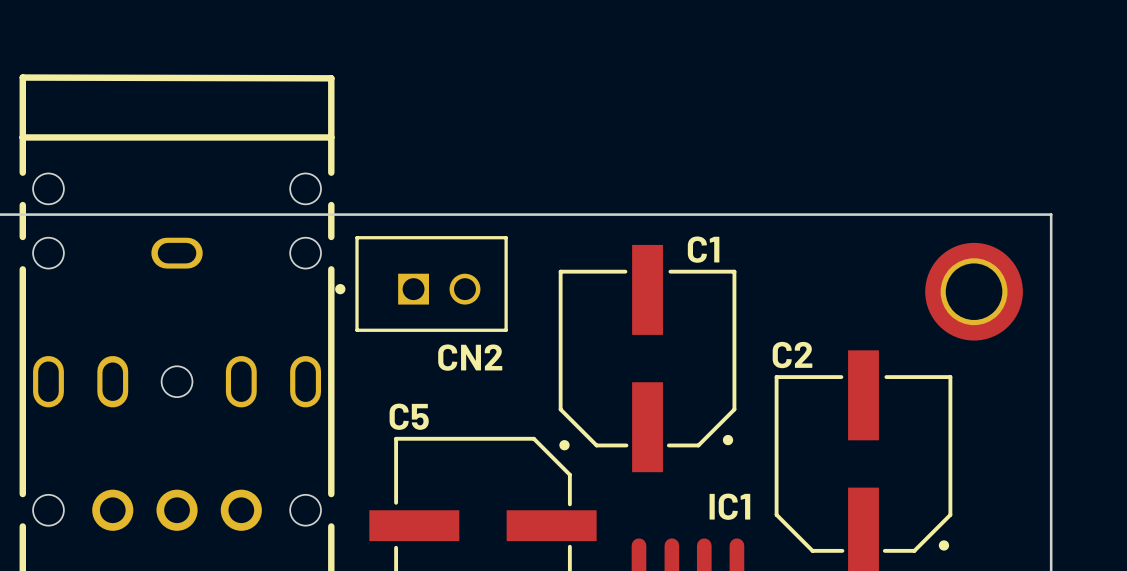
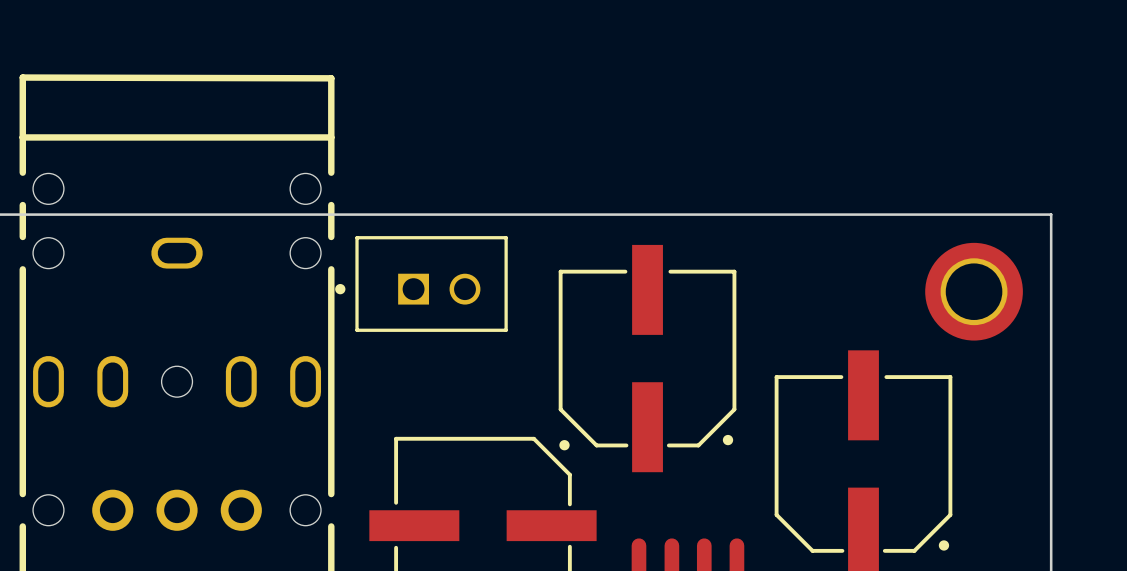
C1 name: C1 (703, 249) -> none
C2 name: C2 (792, 355) -> none
CN2 name: CN2 (470, 357) -> none
C5 name: C5 (409, 416) -> none
IC1 name: IC1 (729, 506) -> none

